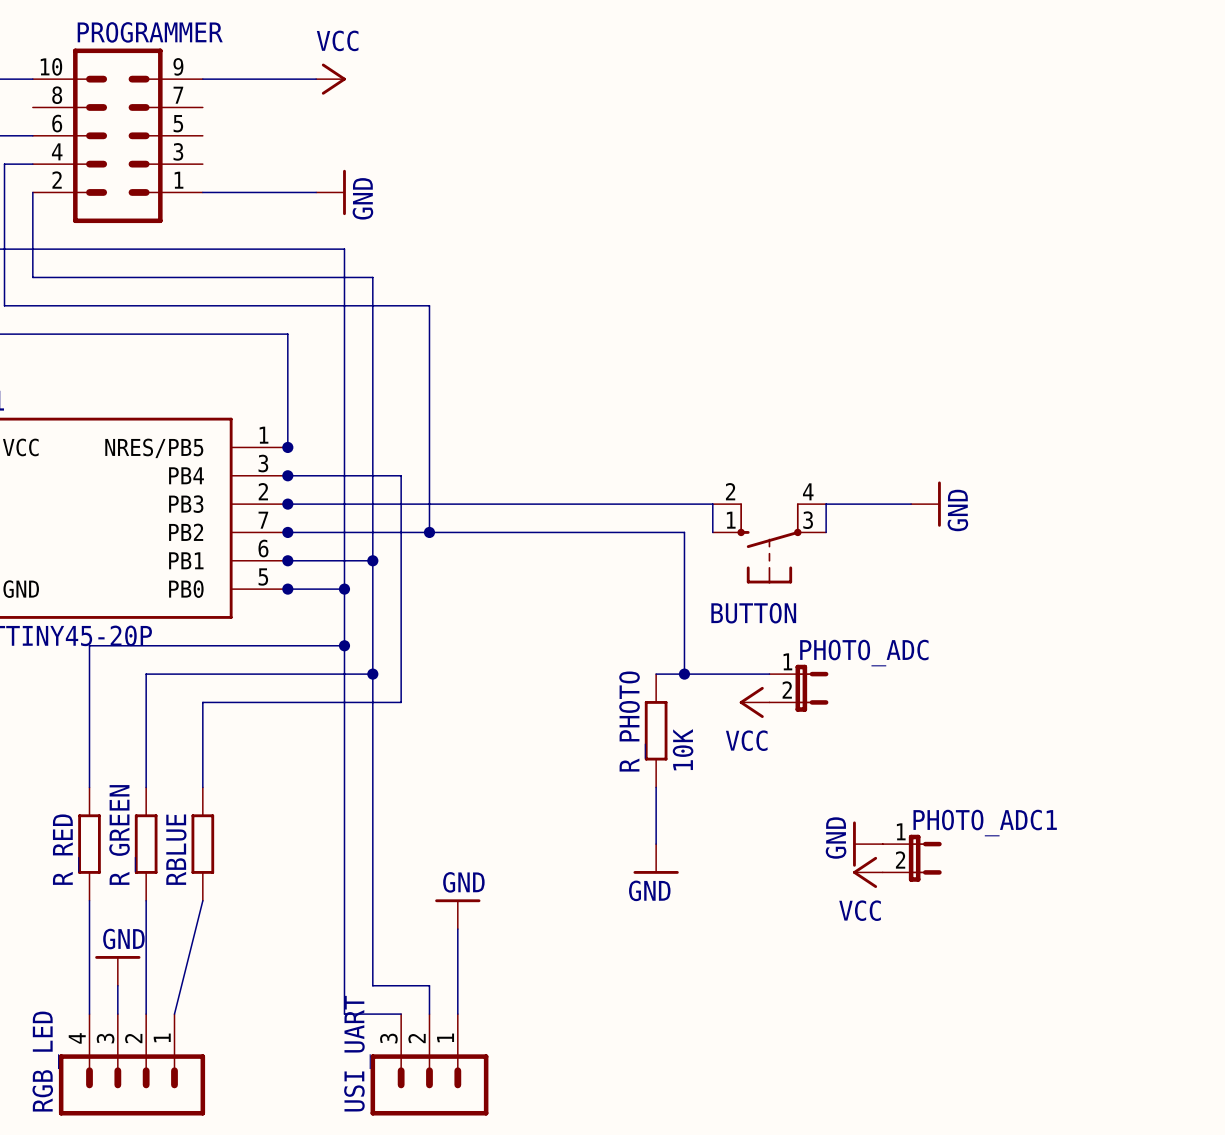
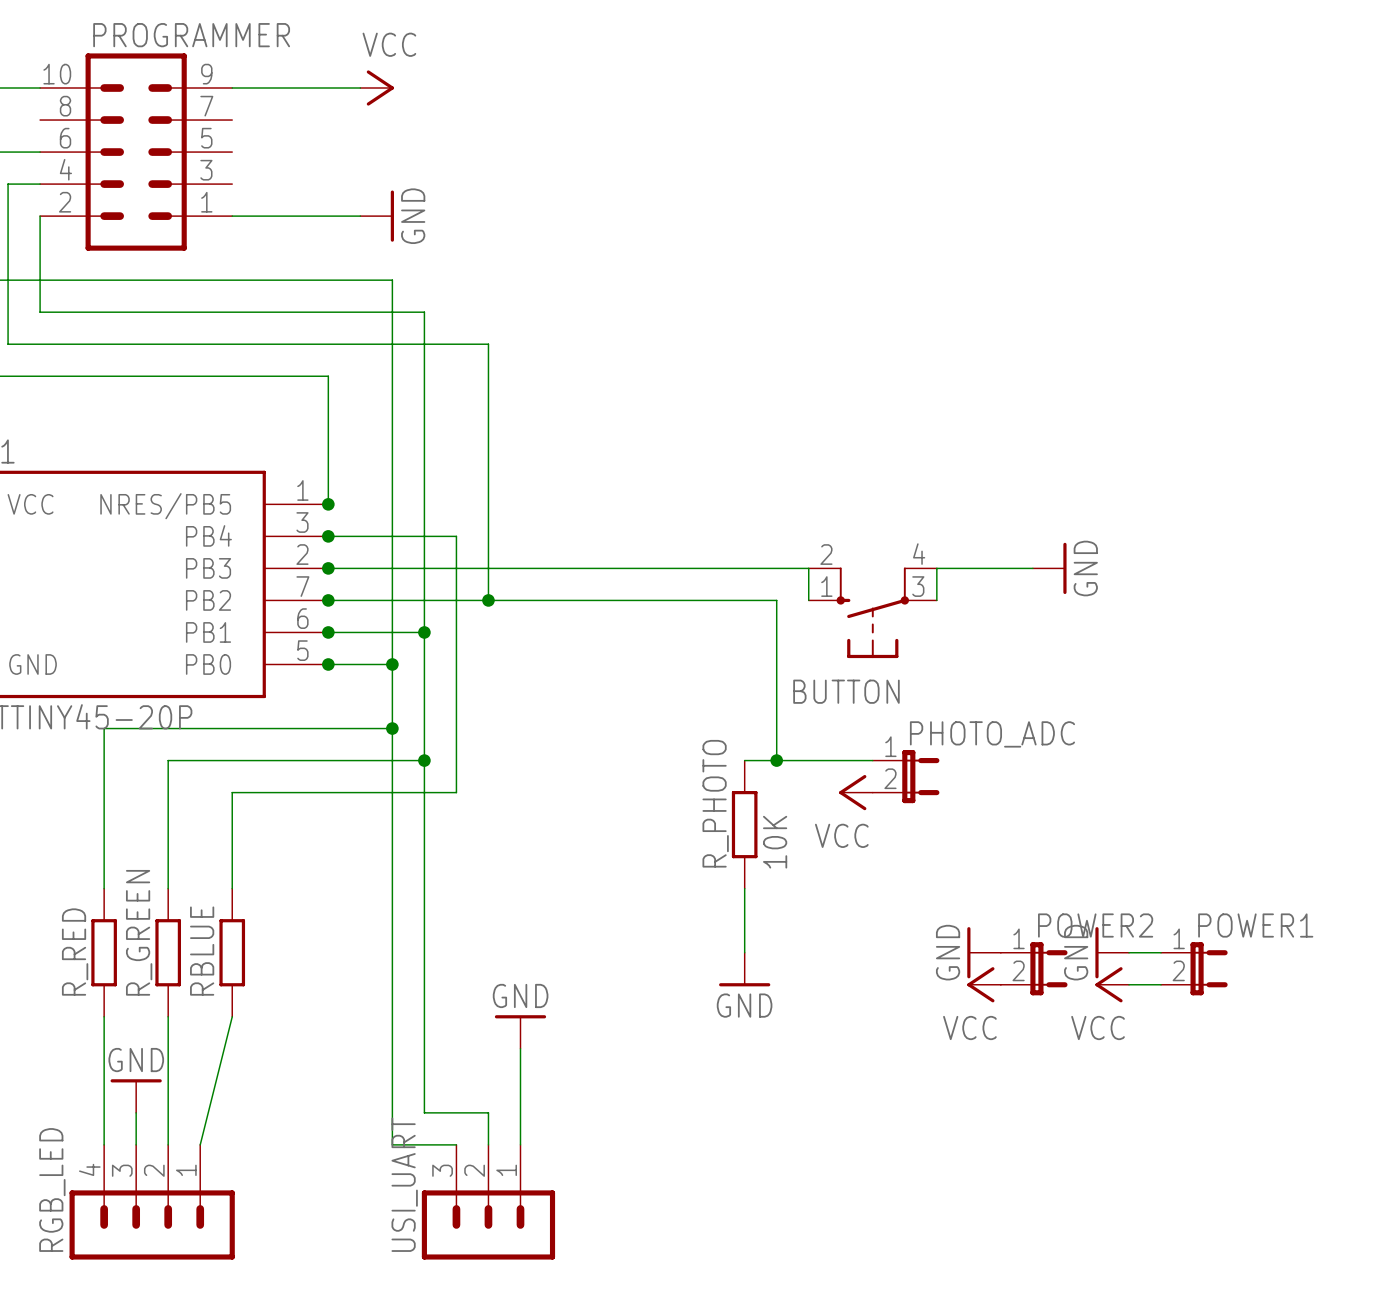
PHOTO_ADC1 name: PHOTO_ADC1 (985, 823) -> POWER2 (1095, 925)
power symbol: none -> GND (1112, 952)
wire: none -> (1129, 952) (1161, 952)
POWER1: none -> (1194, 968)
power symbol: none -> VCC (1112, 984)
wire: none -> (1129, 984) (1161, 984)

